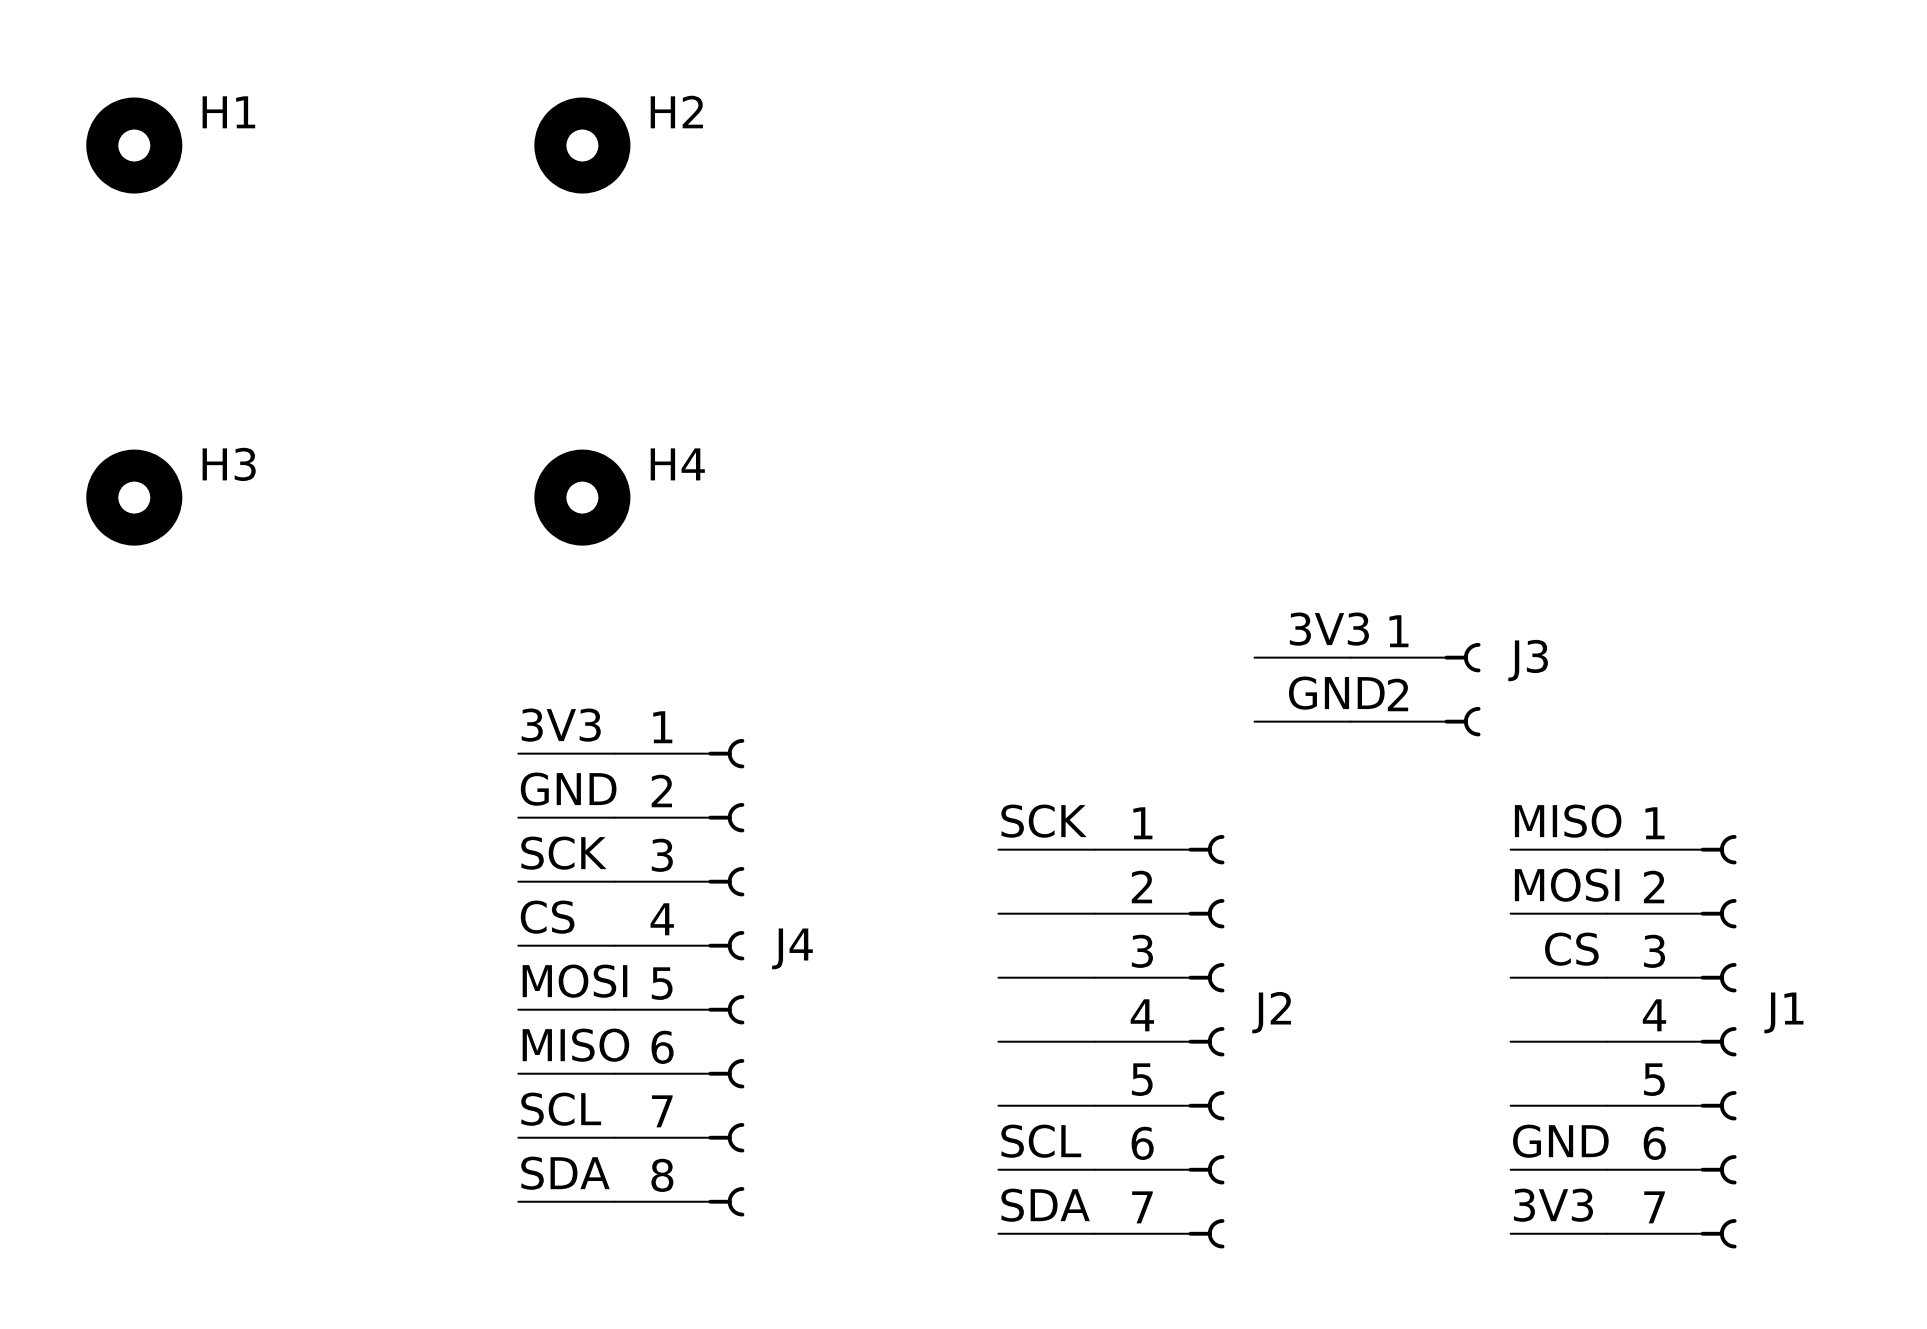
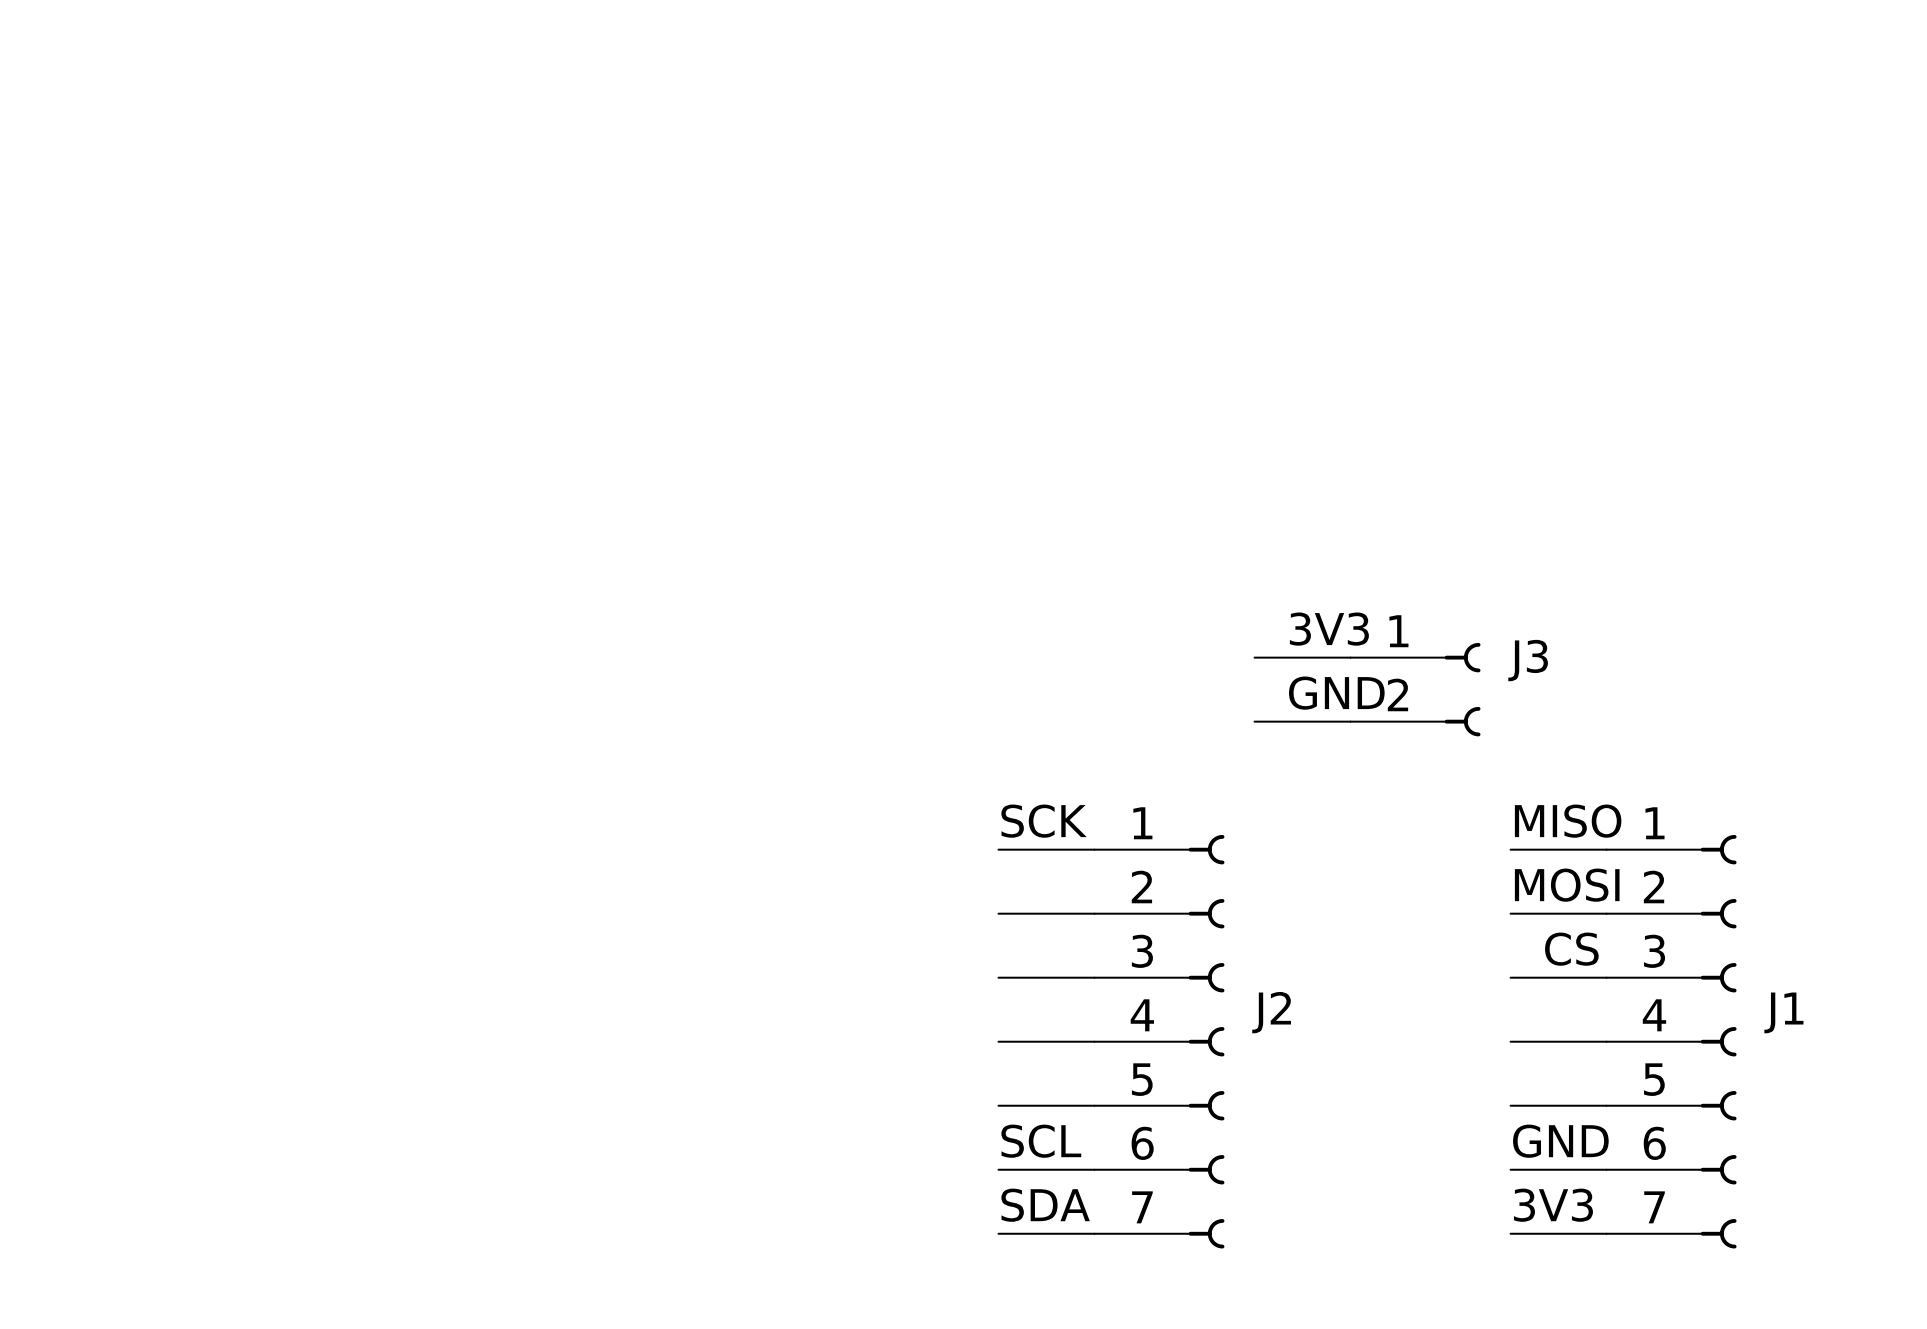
H1: (134, 145) -> none
H2: (582, 145) -> none
H3: (134, 497) -> none
H4: (582, 497) -> none
label: 3V3 (561, 725) -> none
wire: (518, 753) (614, 753) -> none
label: GND (568, 789) -> none
wire: (518, 817) (614, 817) -> none
label: SCK (563, 853) -> none
wire: (518, 881) (614, 881) -> none
label: CS (547, 917) -> none
wire: (518, 945) (614, 945) -> none
J4: (679, 977) -> none
label: MOSI (574, 981) -> none
wire: (518, 1009) (614, 1009) -> none
label: MISO (575, 1045) -> none
wire: (518, 1073) (614, 1073) -> none
label: SCL (561, 1109) -> none
wire: (518, 1137) (614, 1137) -> none
label: SDA (565, 1173) -> none
wire: (518, 1201) (614, 1201) -> none

